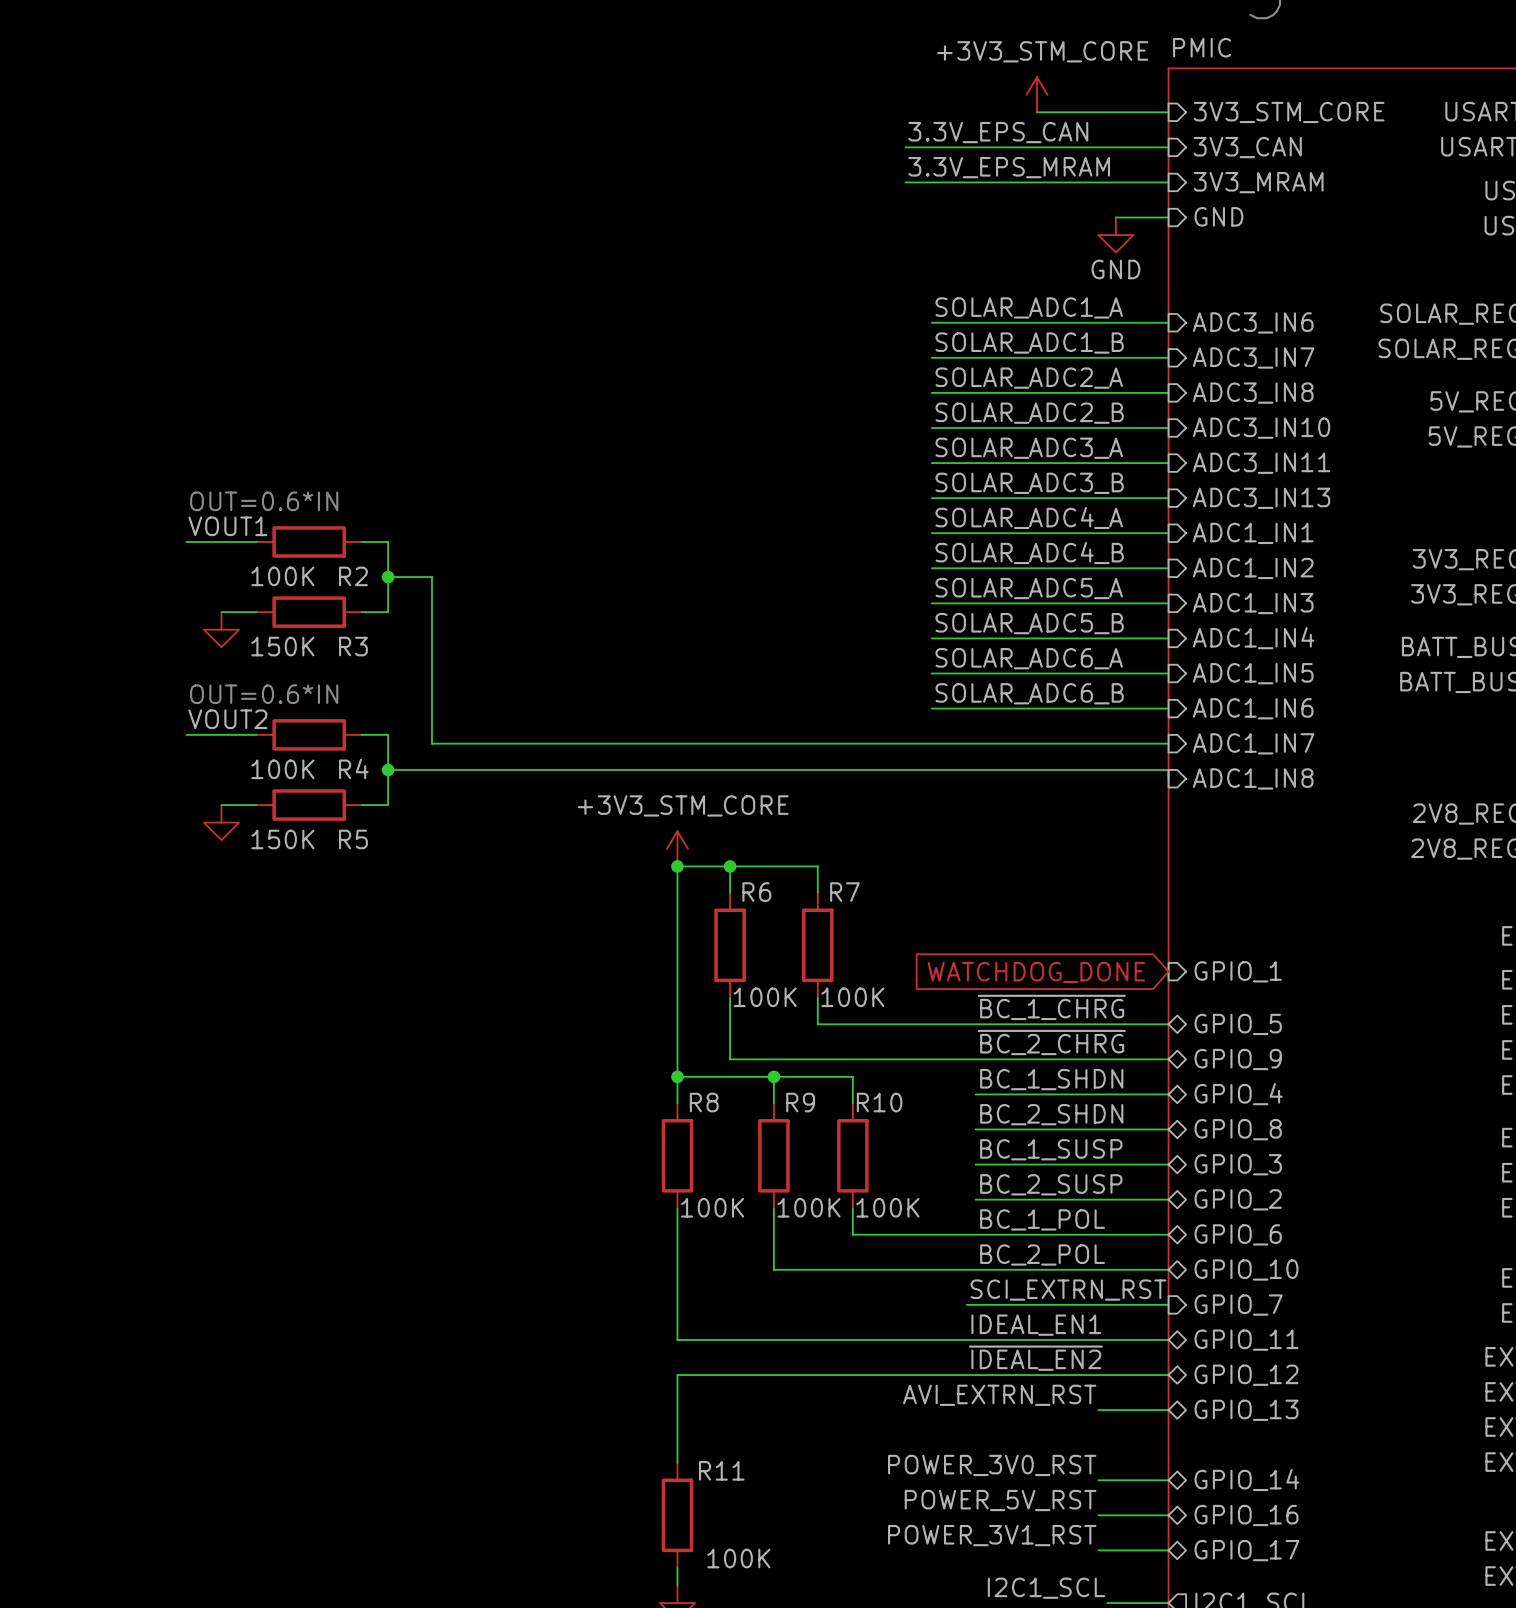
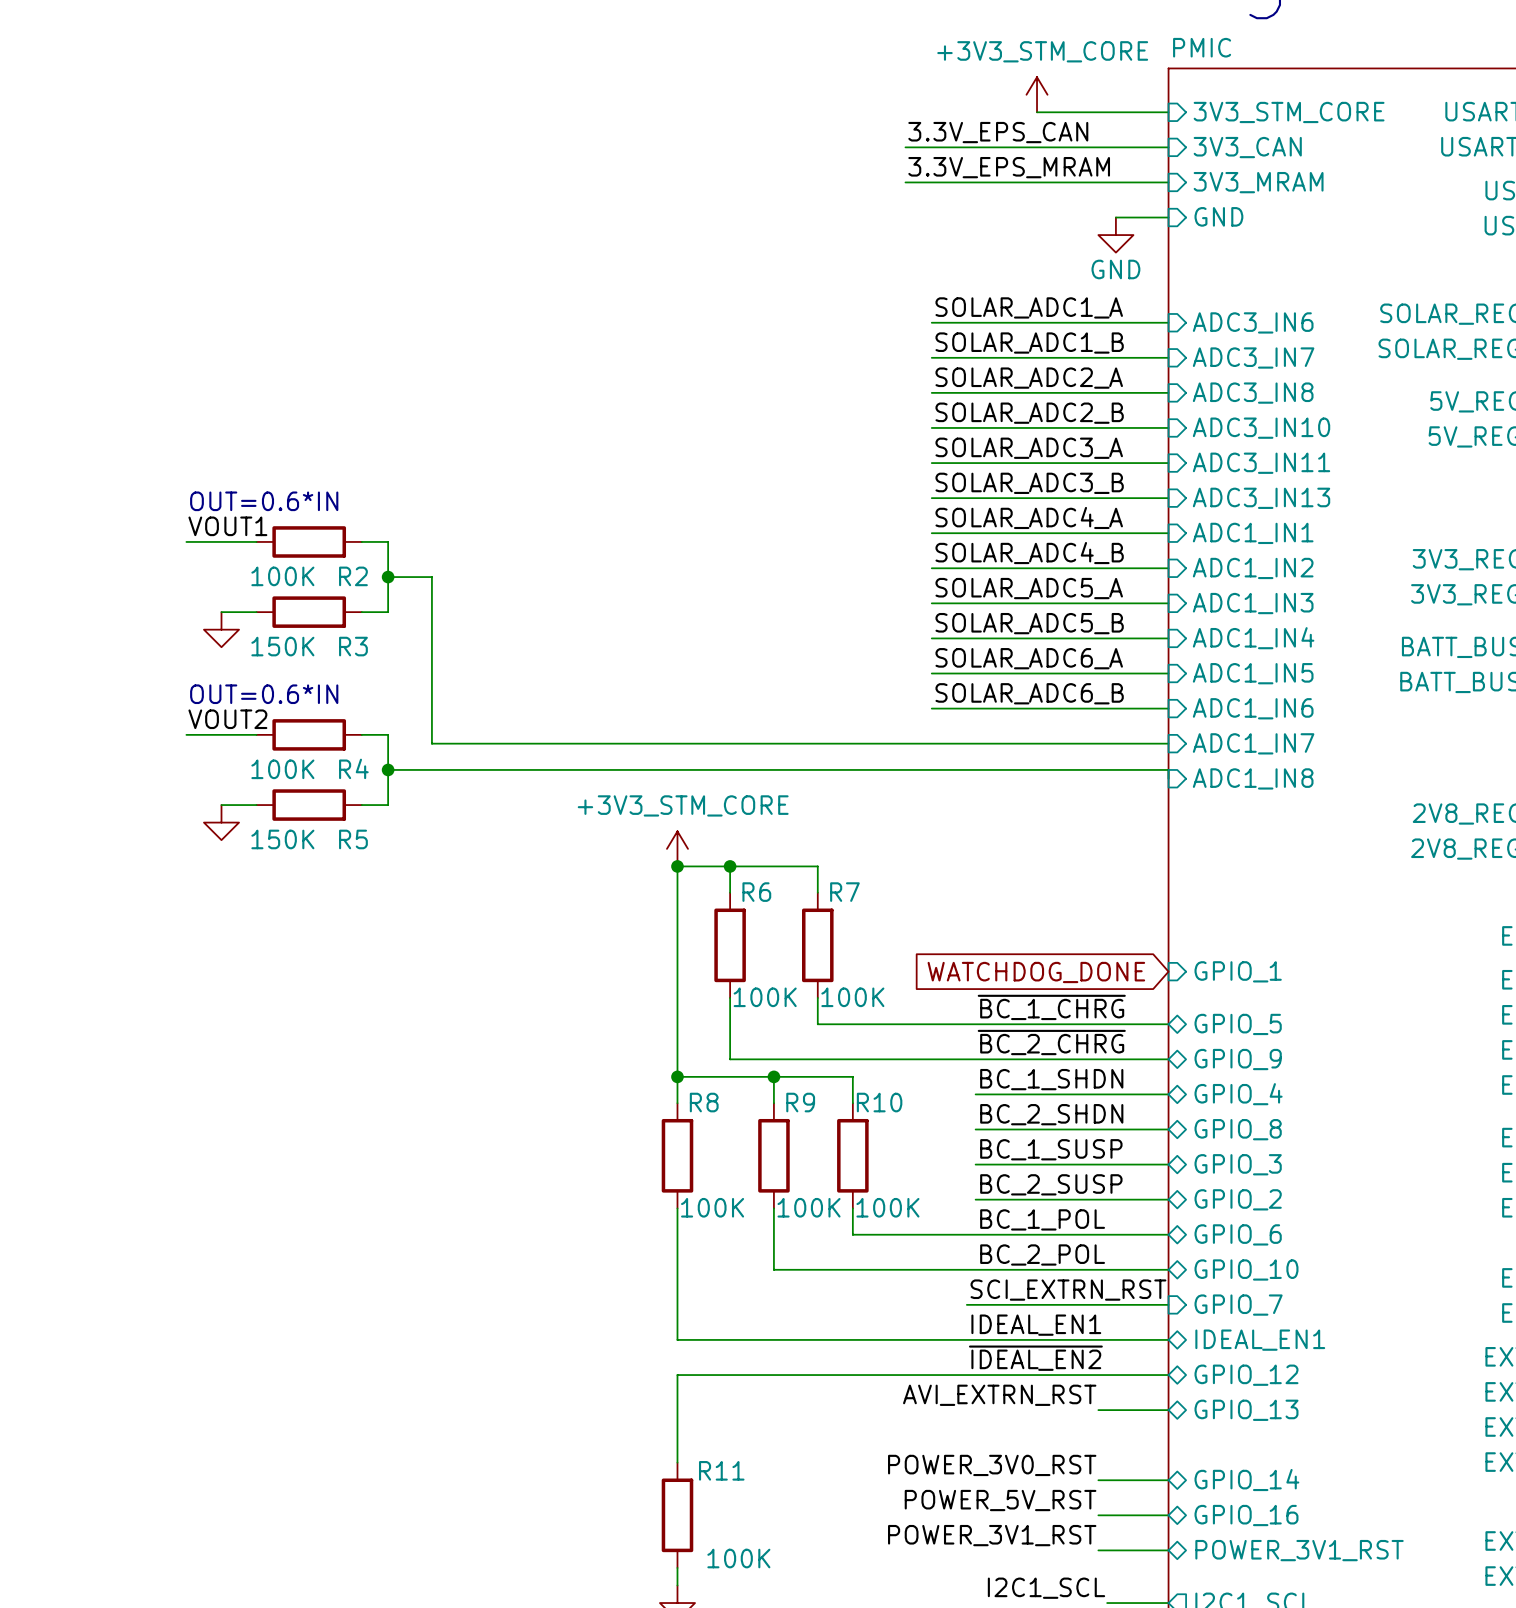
sheet pin: GPIO_11 (1246, 1340) -> IDEAL_EN1 (1260, 1340)
sheet pin: GPIO_17 (1246, 1550) -> POWER_3V1_RST (1299, 1550)

